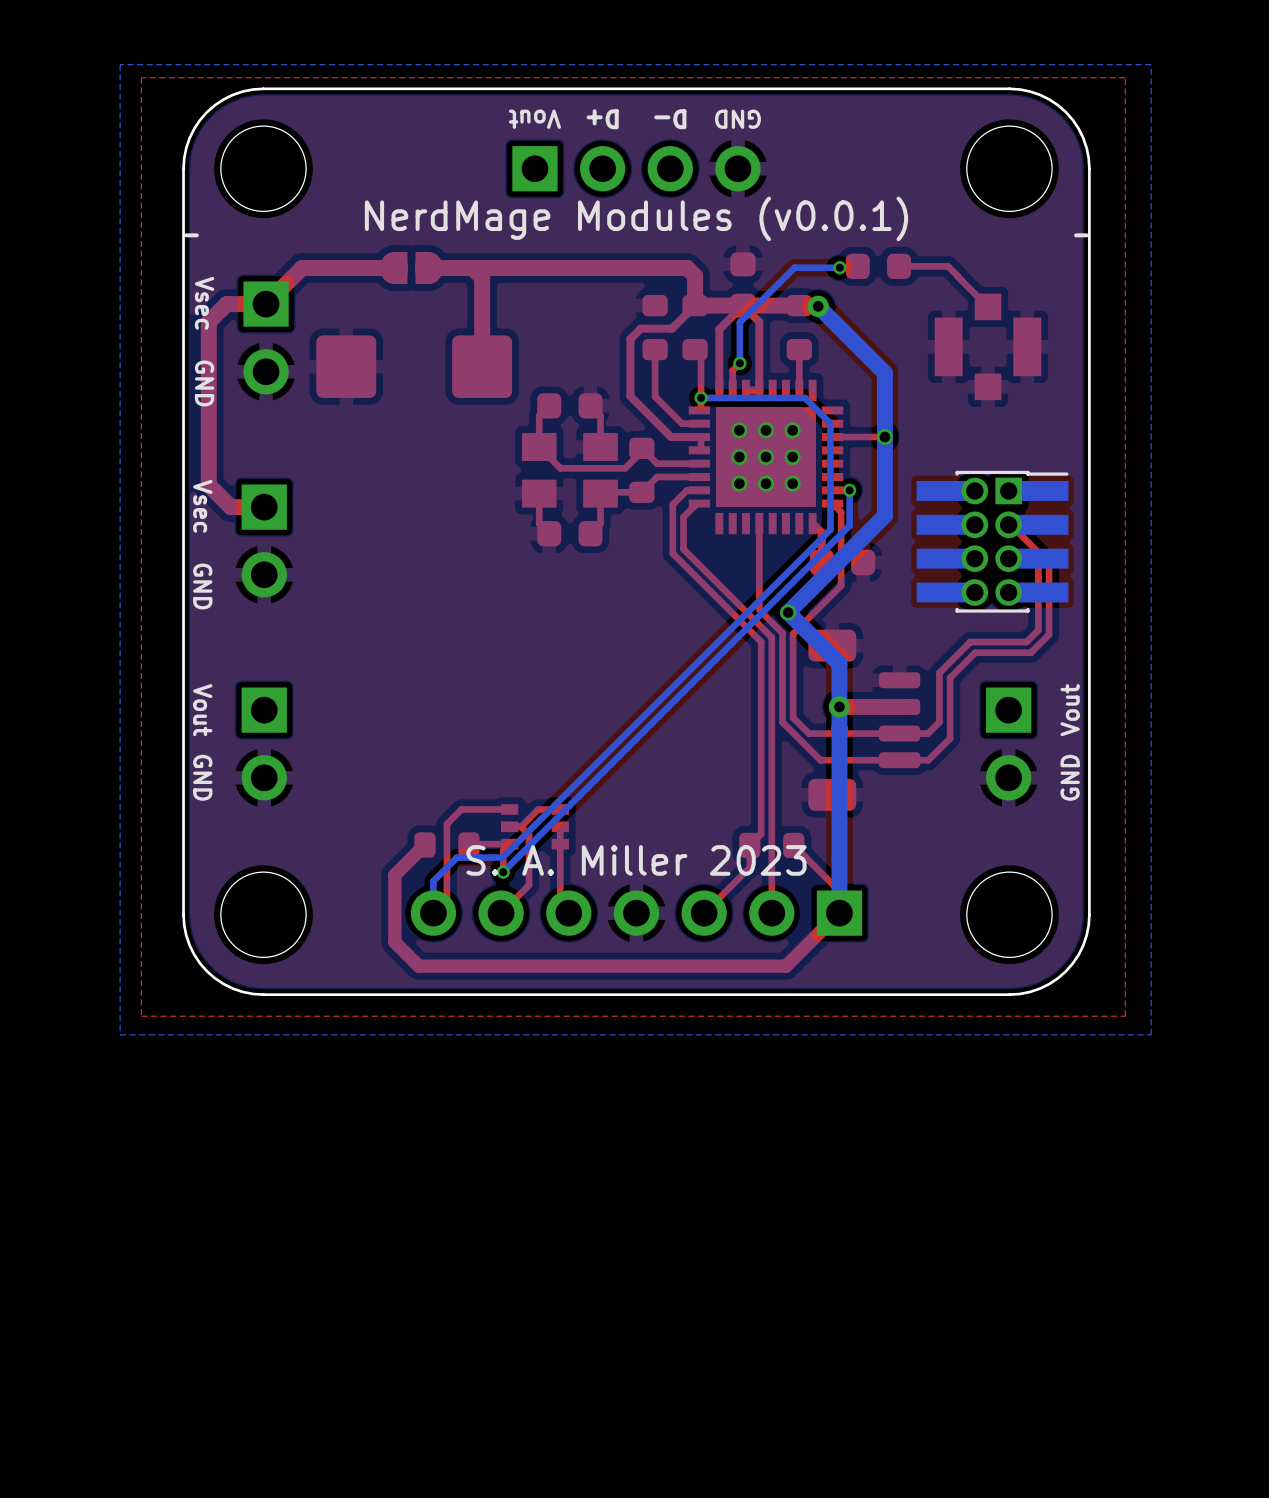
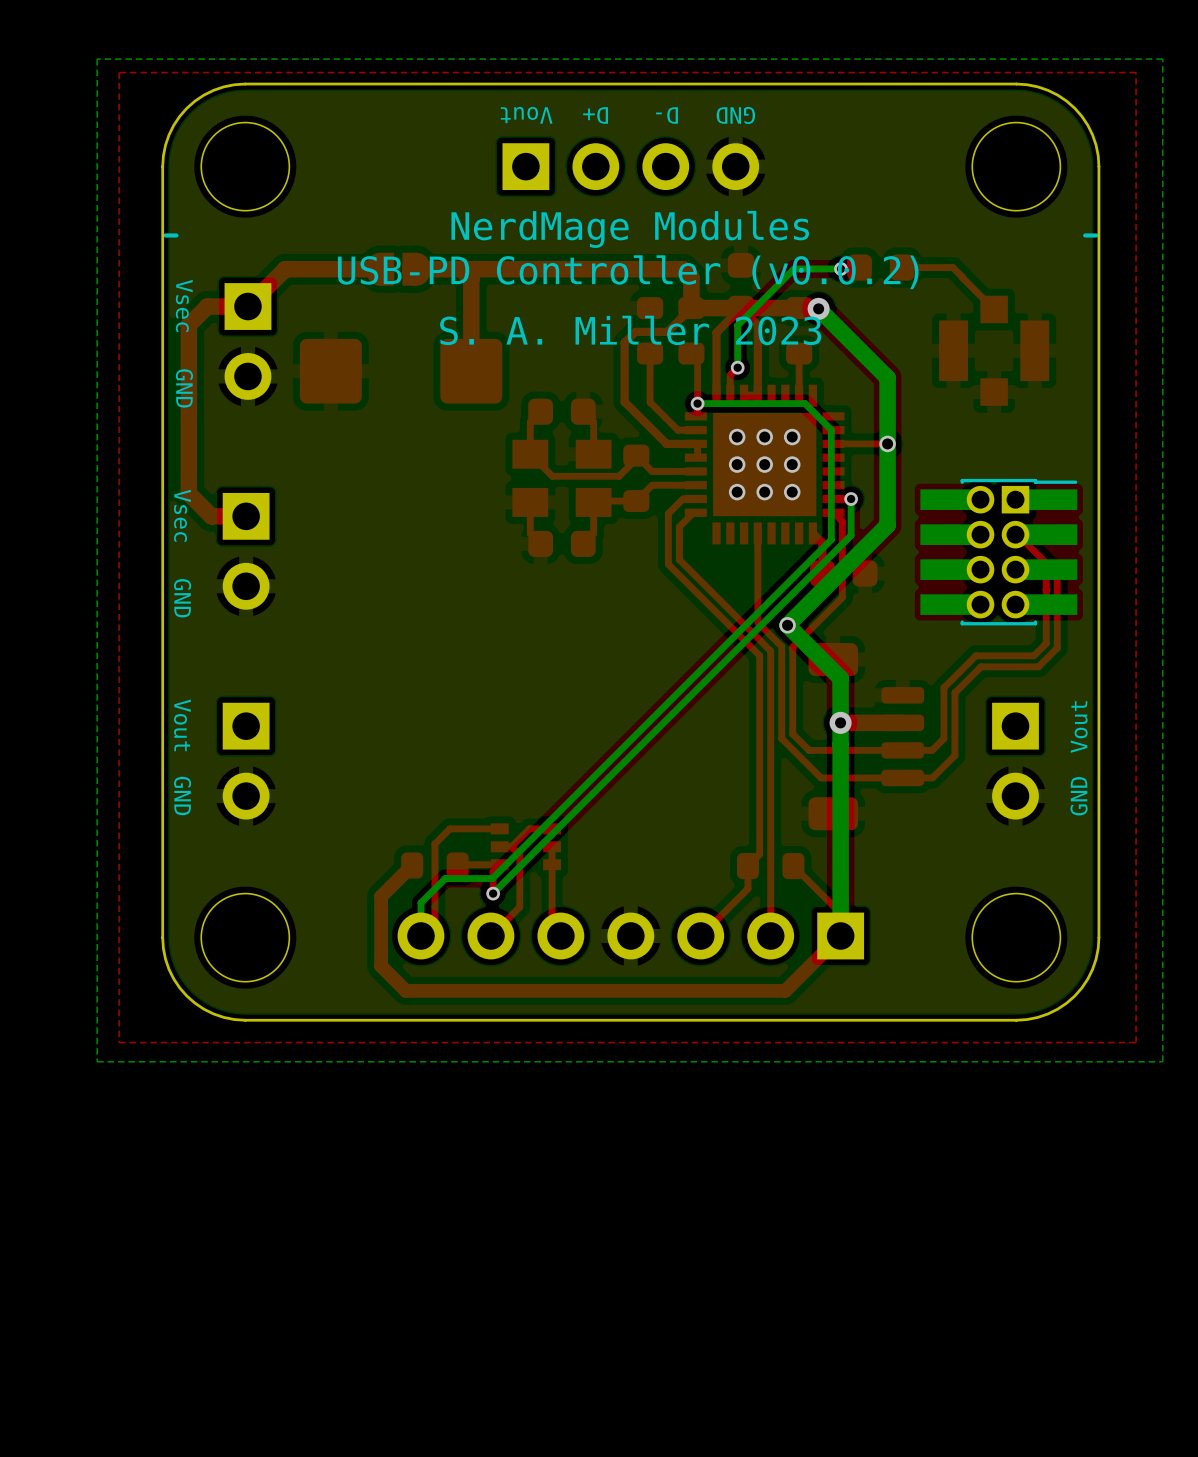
text: NerdMage Modules (v0.0.1) (636, 218) -> NerdMage Modules (630, 229)
text: none -> USB-PD Controller (v0.0.2) (628, 272)
text position: S. A. Miller 2023 (636, 860) -> S. A. Miller 2023 (630, 330)

